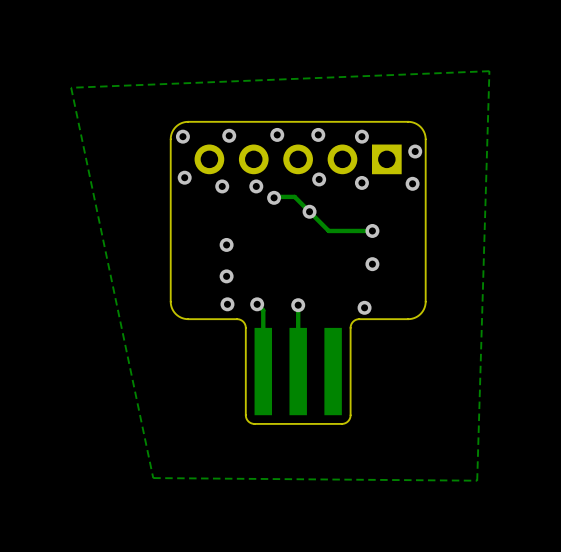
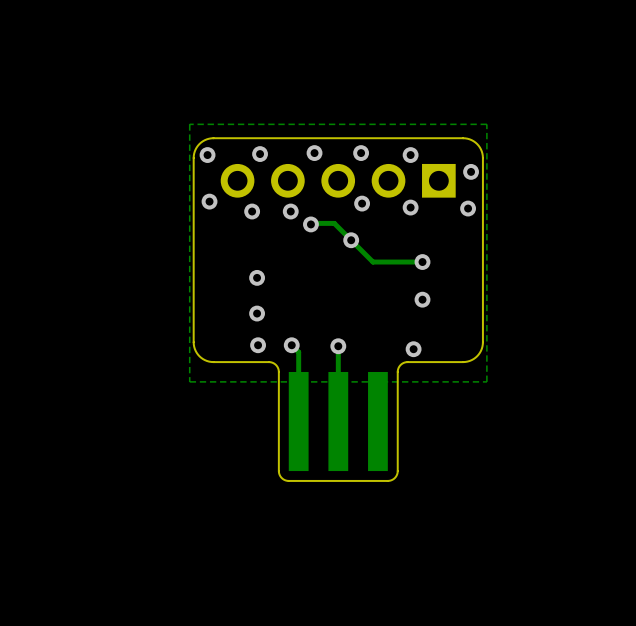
zone outline: (489, 71) (71, 87) (153, 478) (477, 480) (489, 71) -> none
zone outline: none -> (486, 124) (189, 124) (189, 381) (486, 381) (486, 124)

